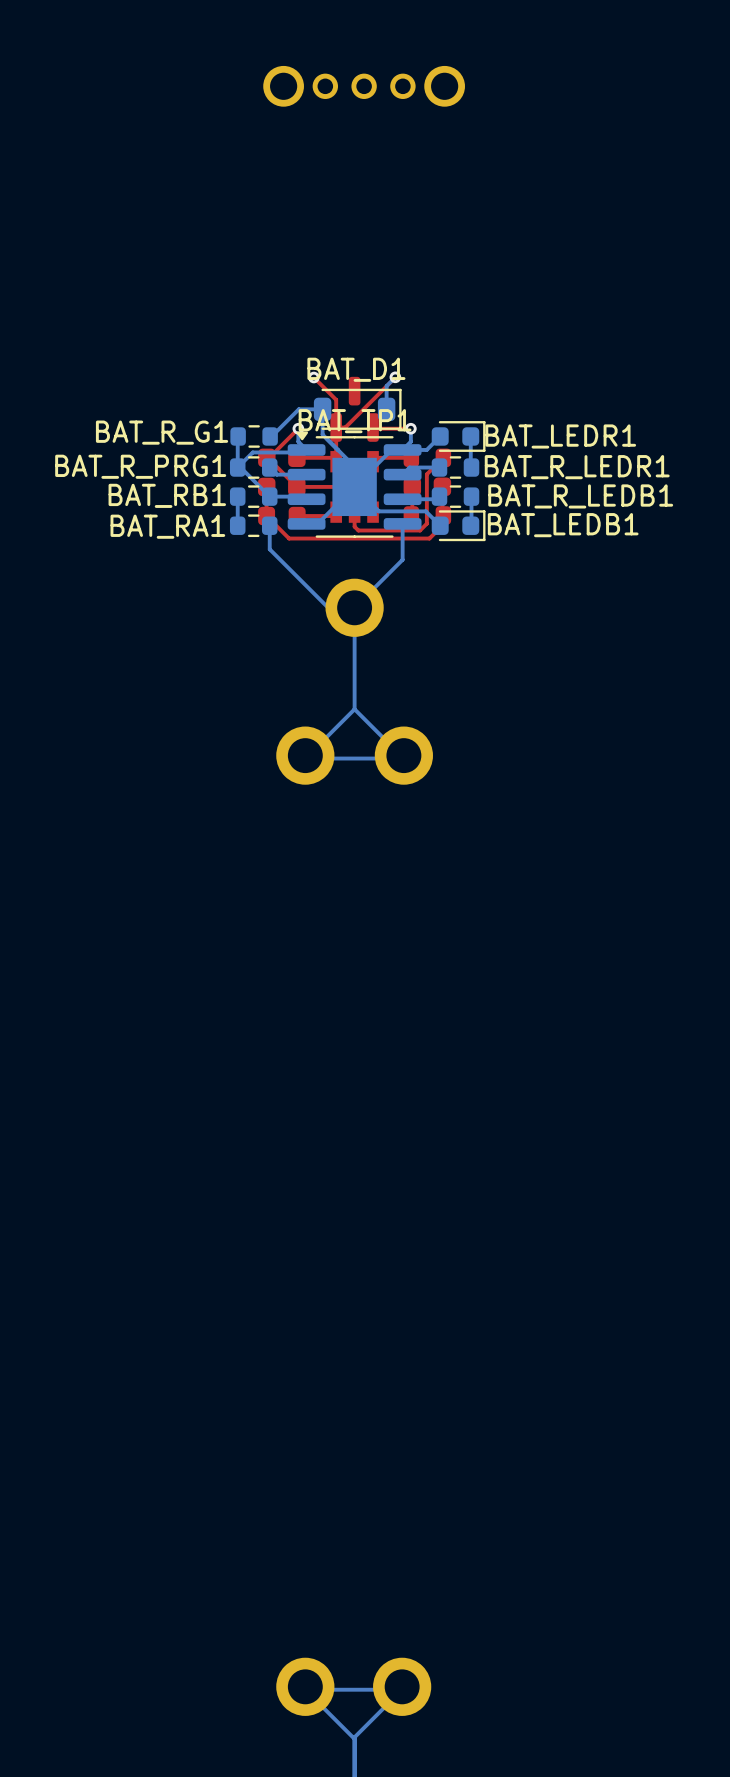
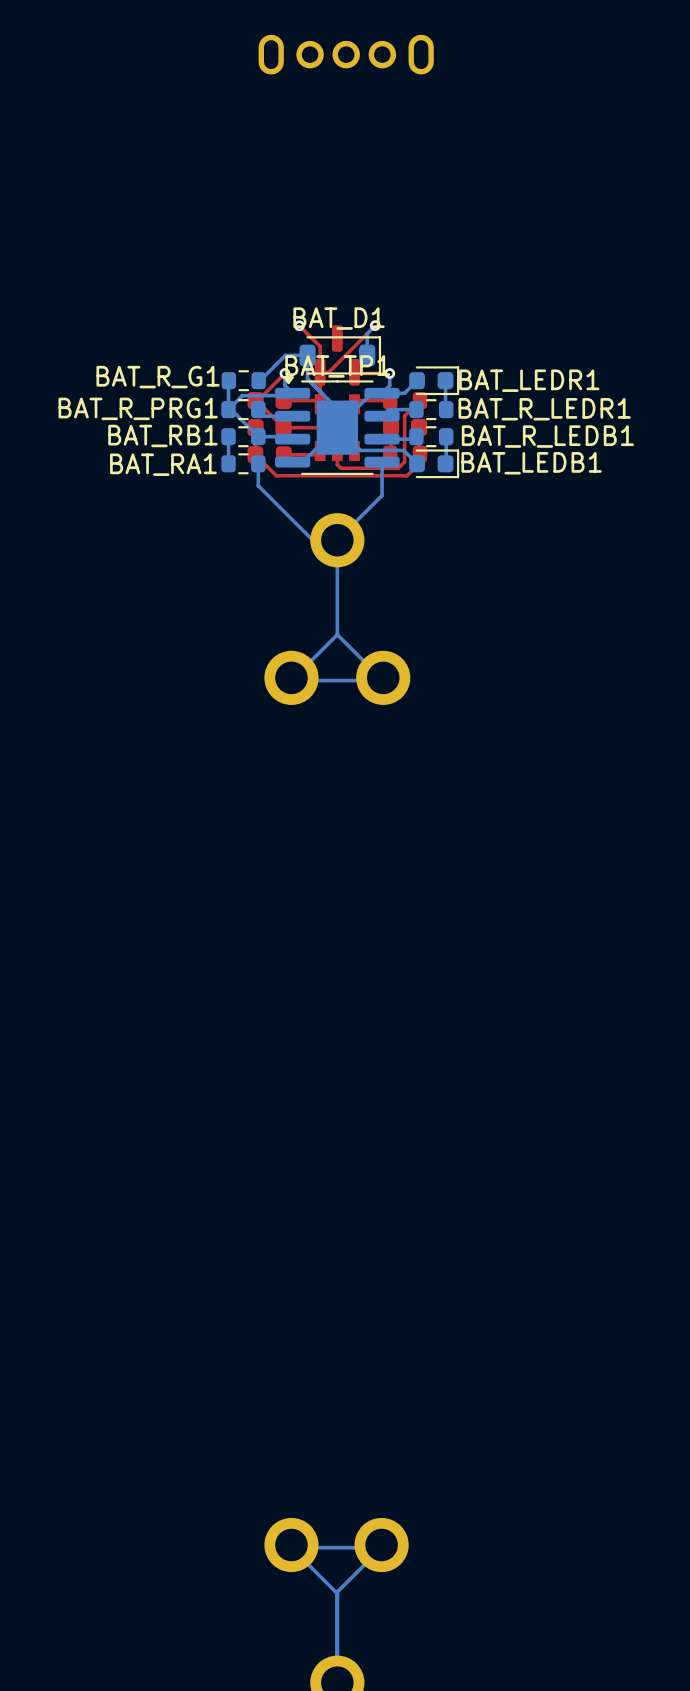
part footprint: [263, 65, 466, 107] -> [258, 34, 434, 75]

